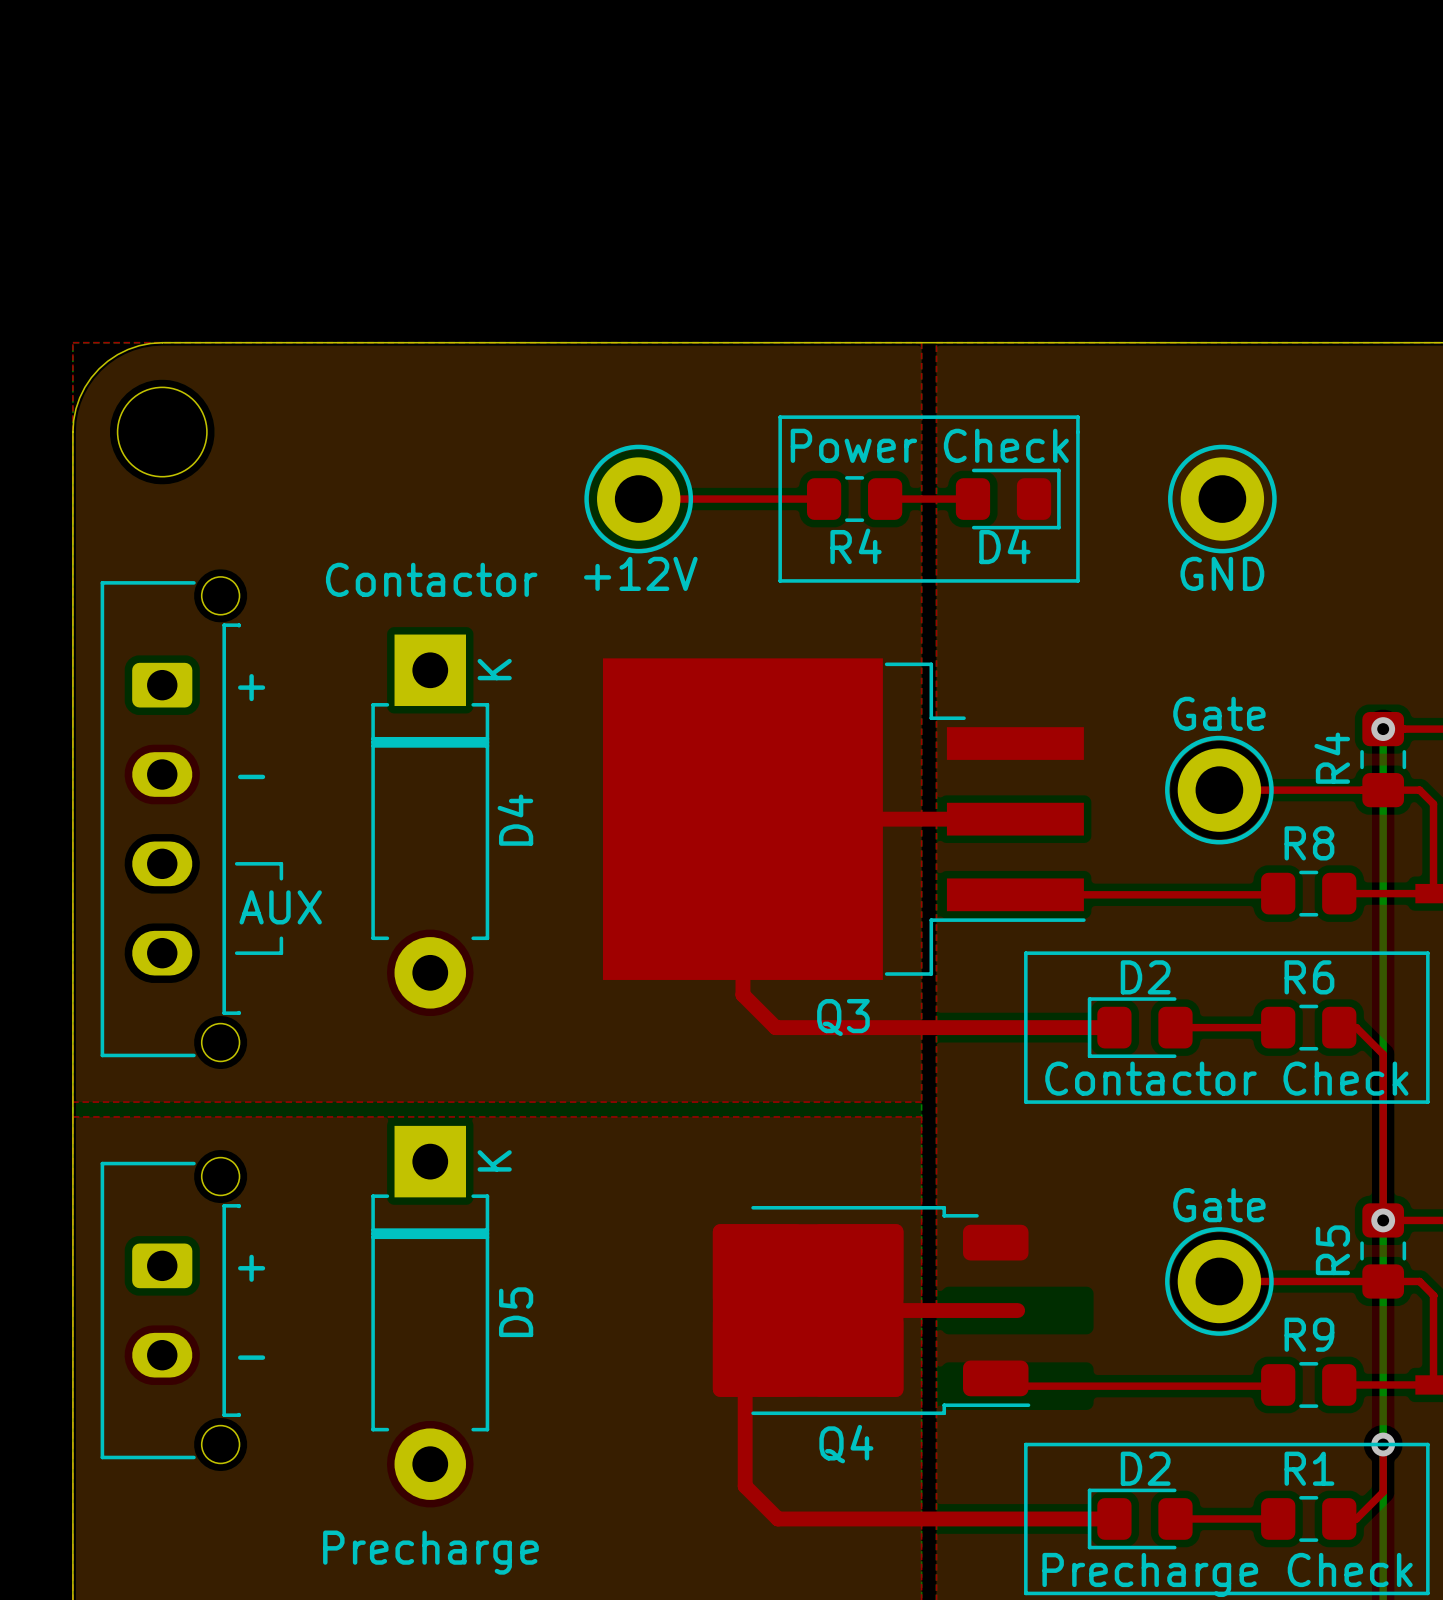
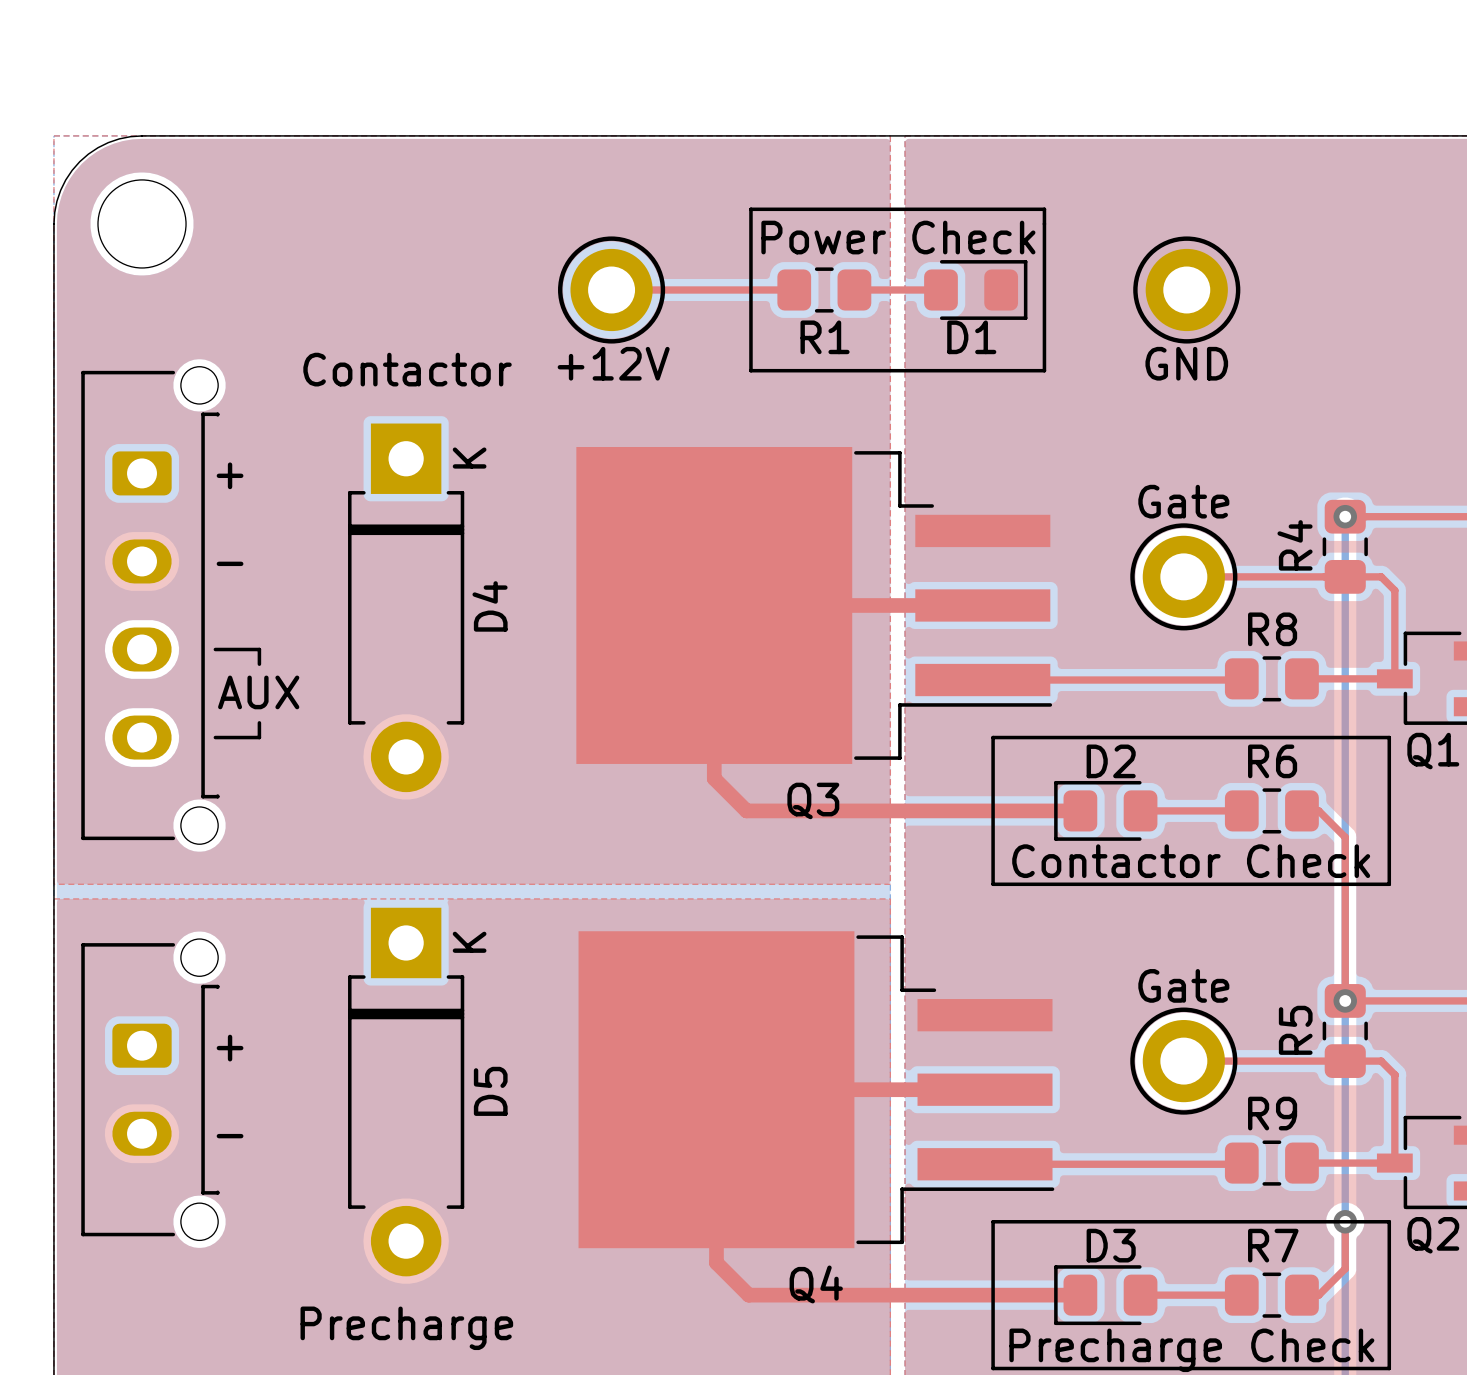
R4 name: R4 (856, 546) -> R1 (825, 337)
D4 name: D4 (1004, 546) -> D1 (971, 337)
Q4 footprint: [712, 1205, 1031, 1416] -> [578, 931, 1055, 1249]
Q4 name position: Q4 (846, 1444) -> Q4 (816, 1284)
D2 name: D2 (1145, 1468) -> D3 (1111, 1245)
R1 name: R1 (1309, 1468) -> R7 (1273, 1245)

